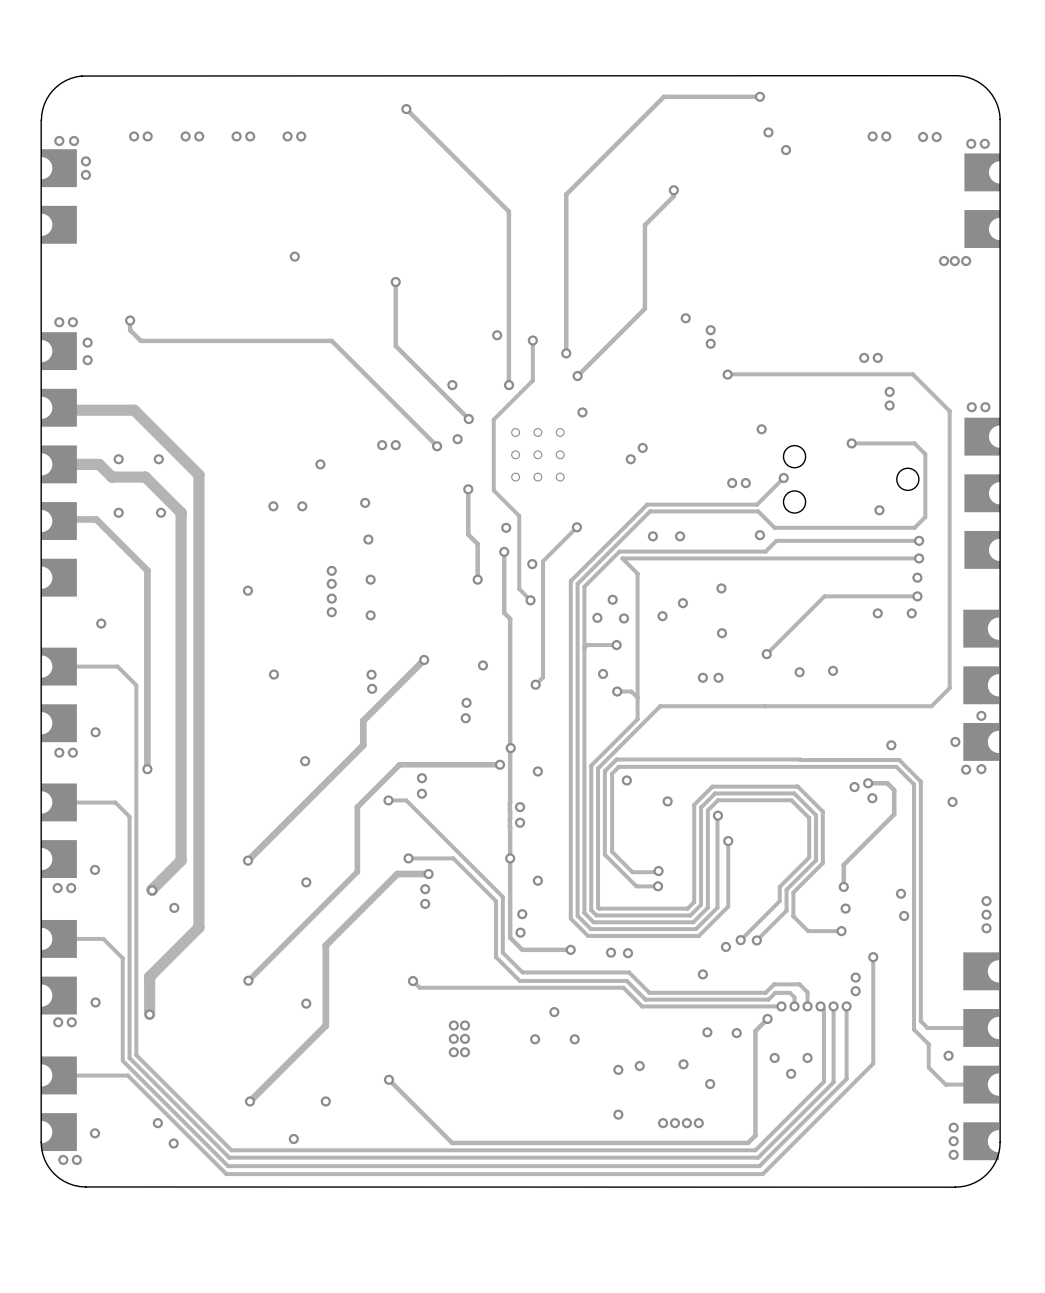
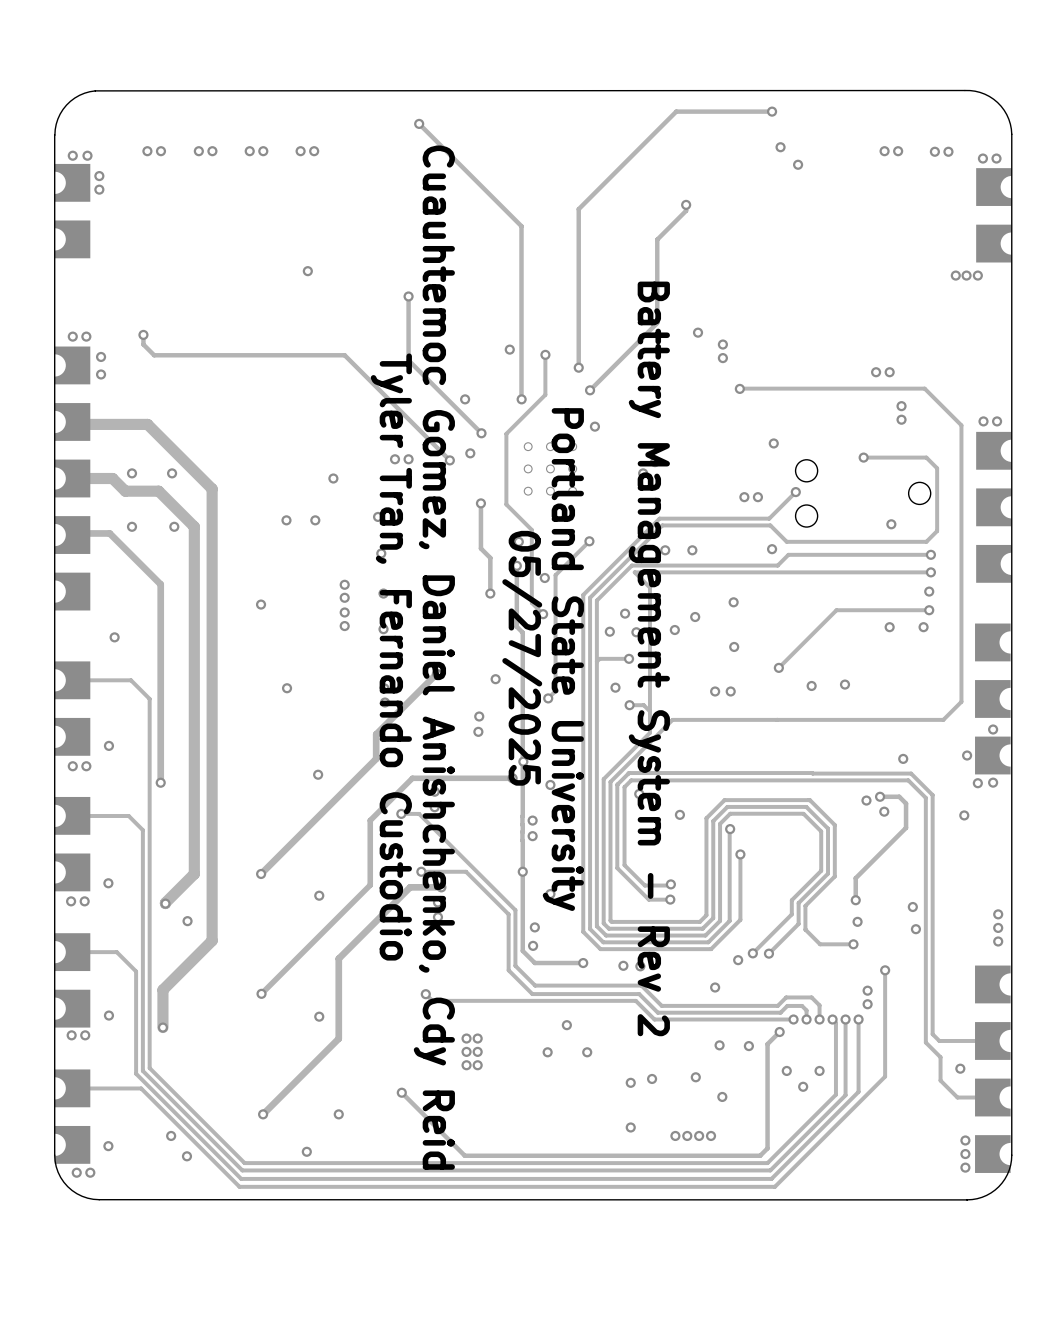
text: none -> Tyler Tran, Fernando Custodio (391, 657)
text: none -> Cuauhtemoc Gomez, Daniel Anishchenko, Cdy Reid (434, 657)
text: none -> 05/27/2025 (522, 658)
text: none -> Portland State University (563, 659)
text: none -> Battery Management System - Rev 2 (649, 658)

